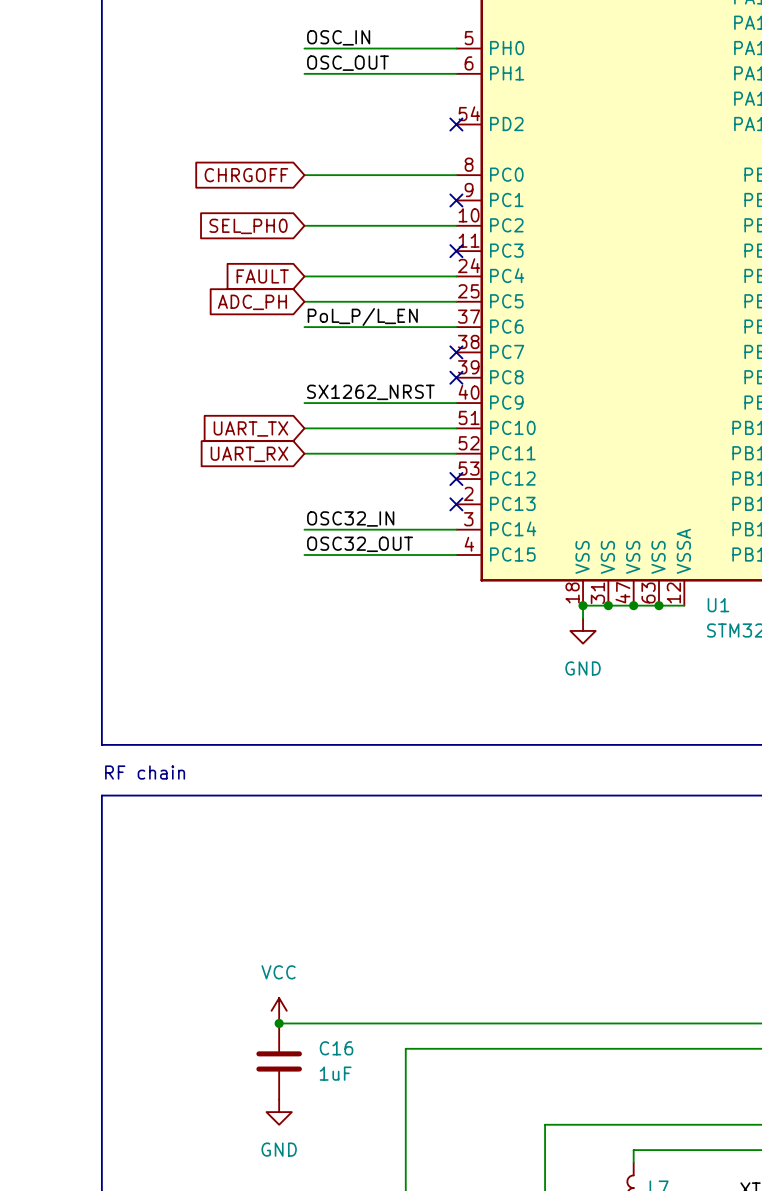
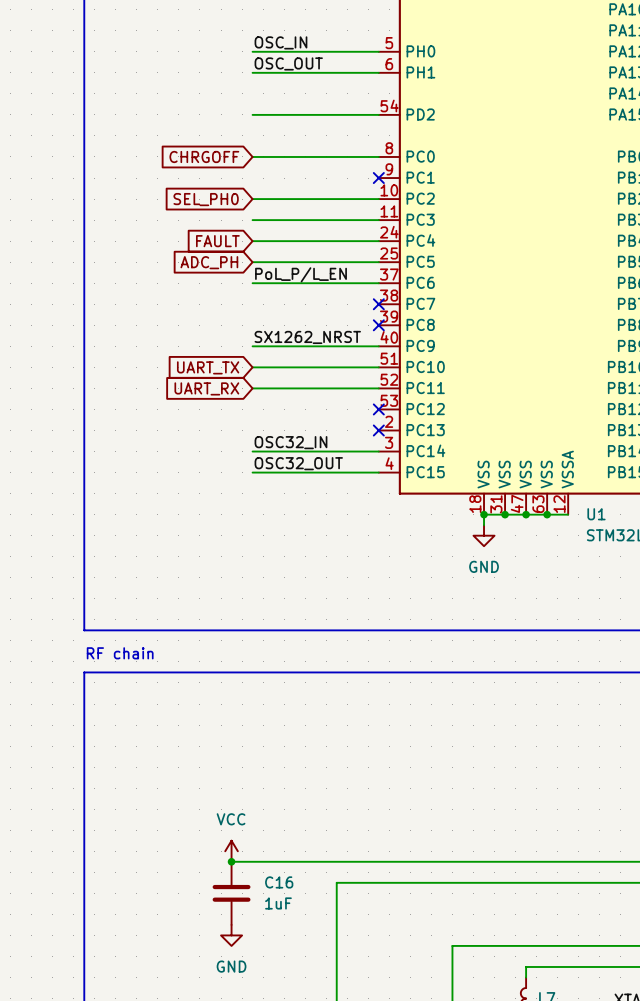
wire: none -> (252, 114) (378, 114)
no-connect mark: (456, 124) -> none
wire: none -> (252, 220) (378, 220)
no-connect mark: (456, 251) -> none

